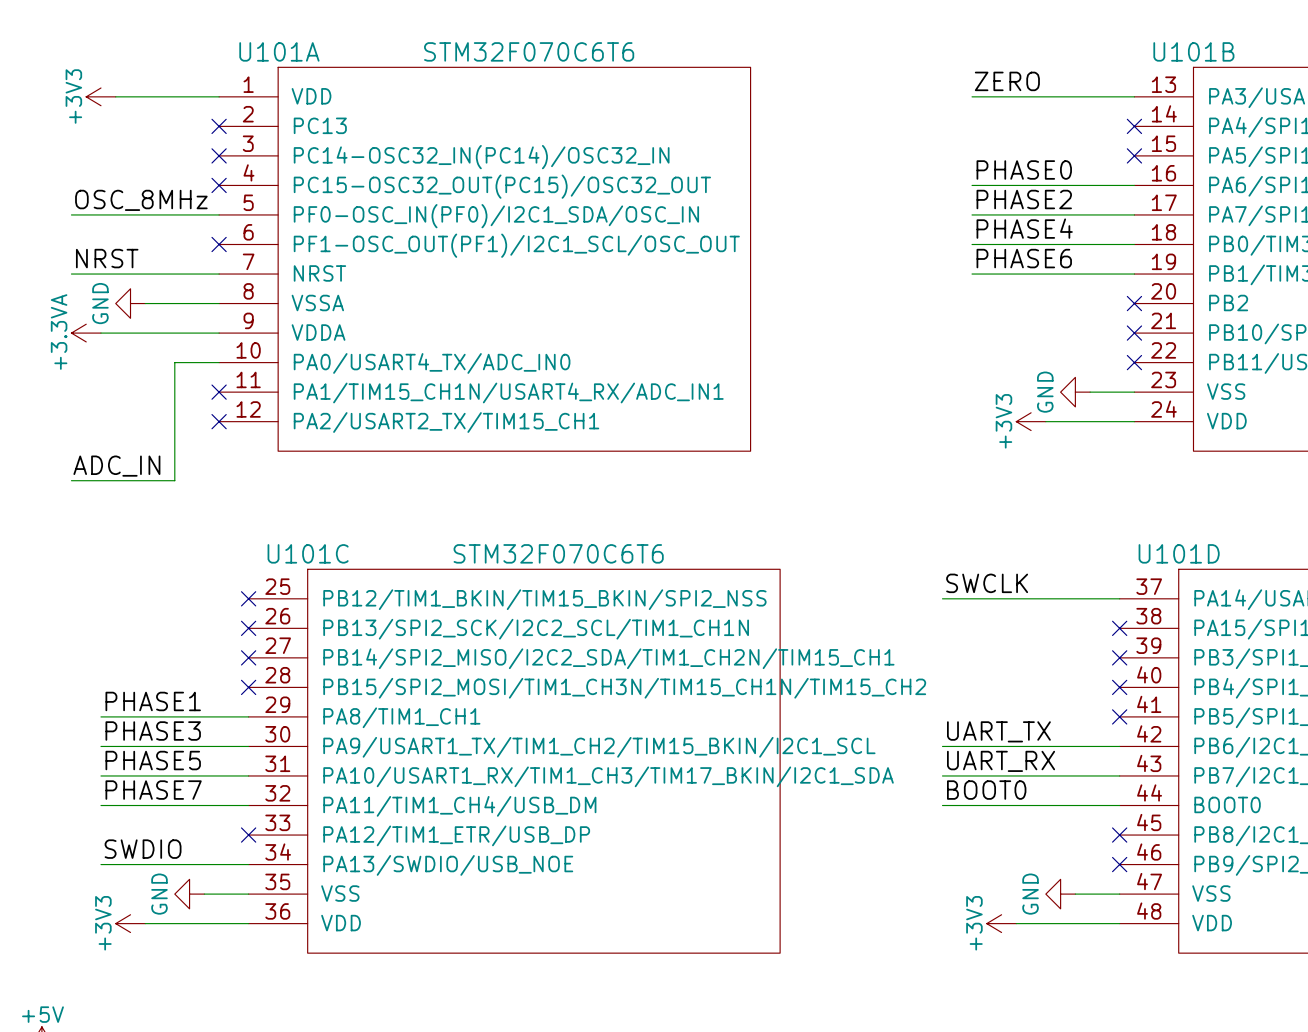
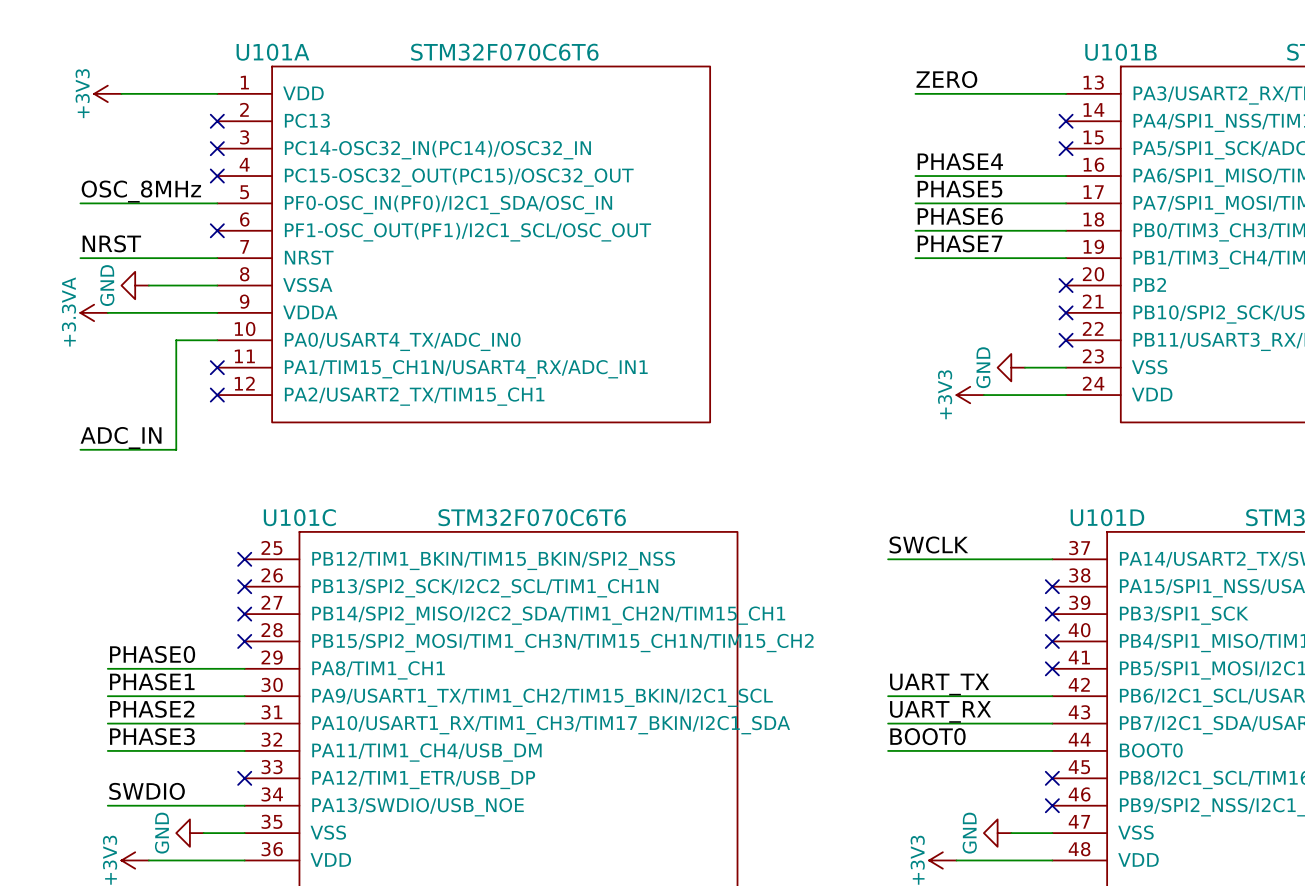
label: PHASE0 (1024, 169) -> PHASE4 (960, 161)
label: PHASE2 (1024, 199) -> PHASE5 (960, 189)
label: PHASE4 (1024, 228) -> PHASE6 (960, 216)
label: PHASE6 (1024, 258) -> PHASE7 (960, 243)
label: PHASE1 (153, 701) -> PHASE0 (152, 654)
label: PHASE3 (153, 731) -> PHASE1 (152, 681)
label: PHASE5 (153, 760) -> PHASE2 (152, 709)
label: PHASE7 (153, 790) -> PHASE3 (152, 736)

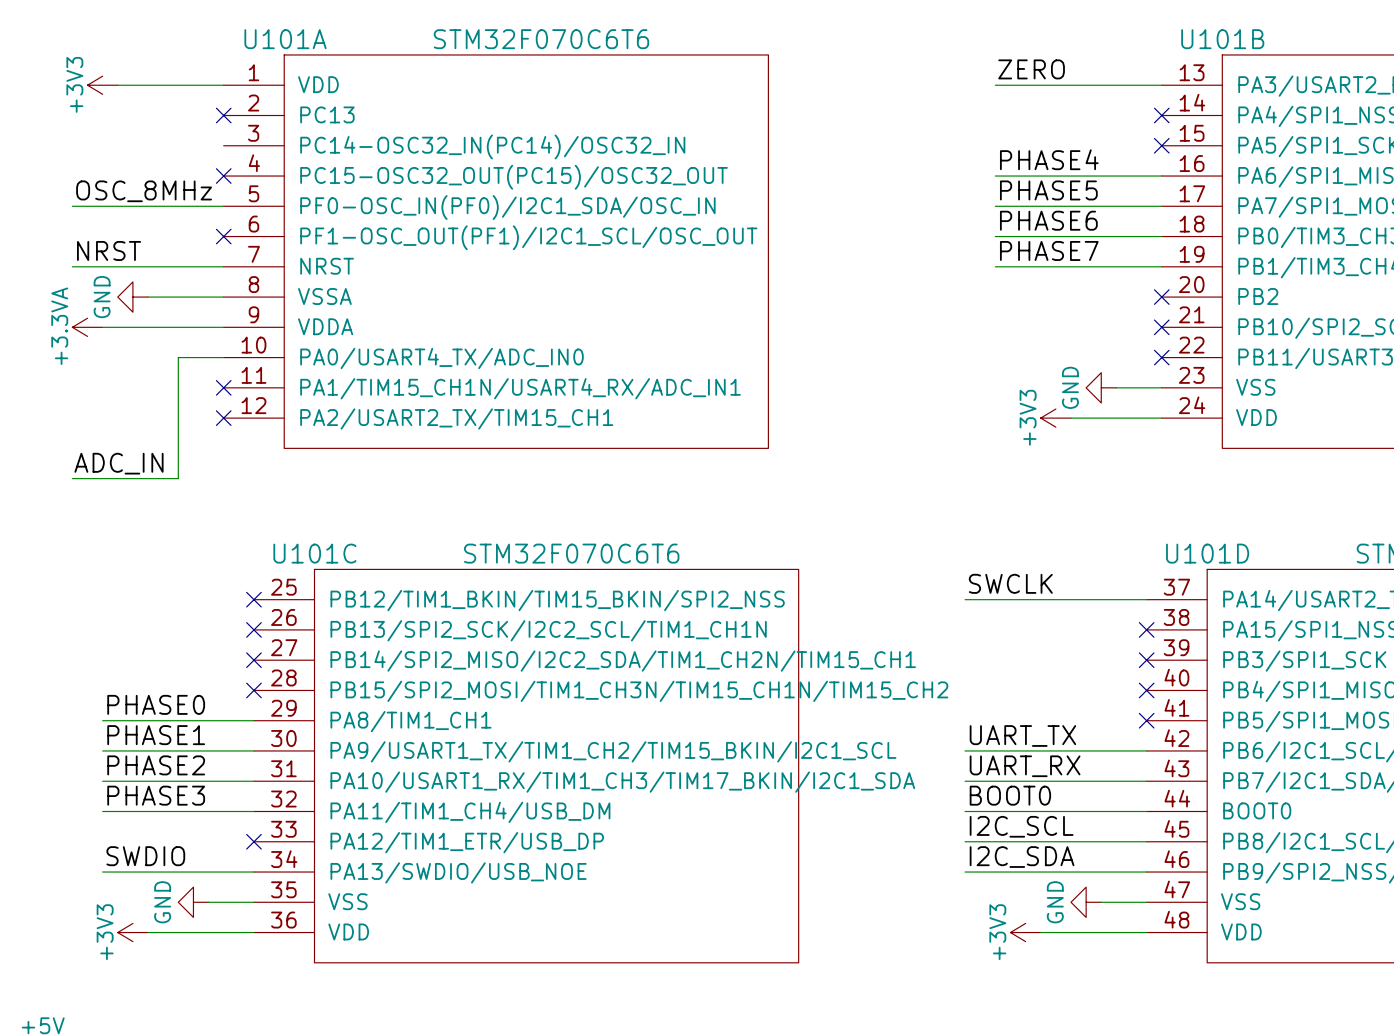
no-connect mark: (217, 148) -> none
label: none -> I2C_SCL (1021, 826)
wire: none -> (965, 841) (1146, 841)
no-connect mark: (1052, 778) -> none
label: none -> I2C_SDA (1022, 857)
wire: none -> (965, 872) (1146, 872)
no-connect mark: (1052, 805) -> none

